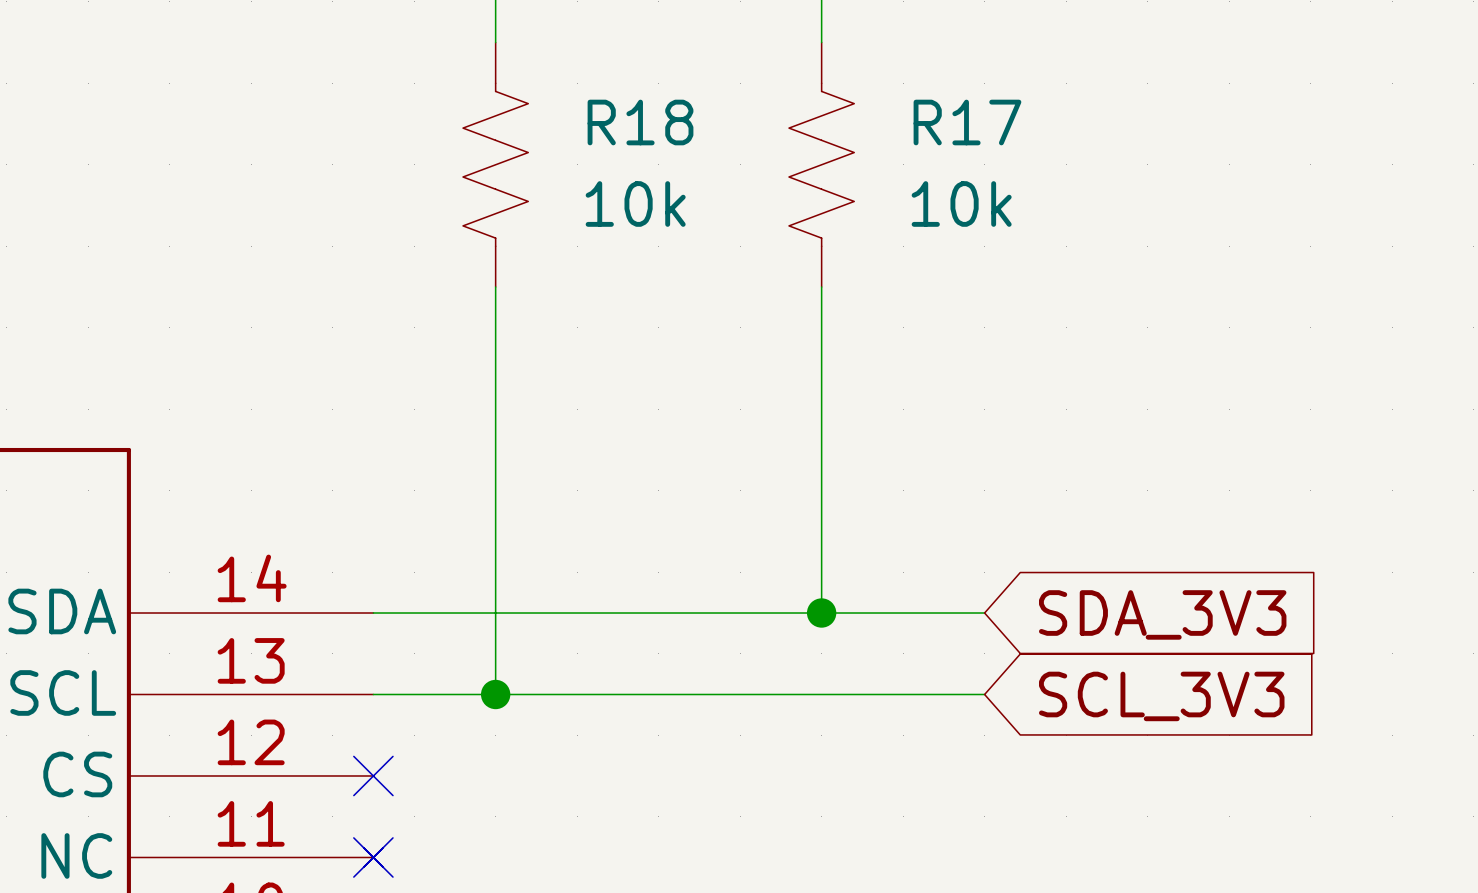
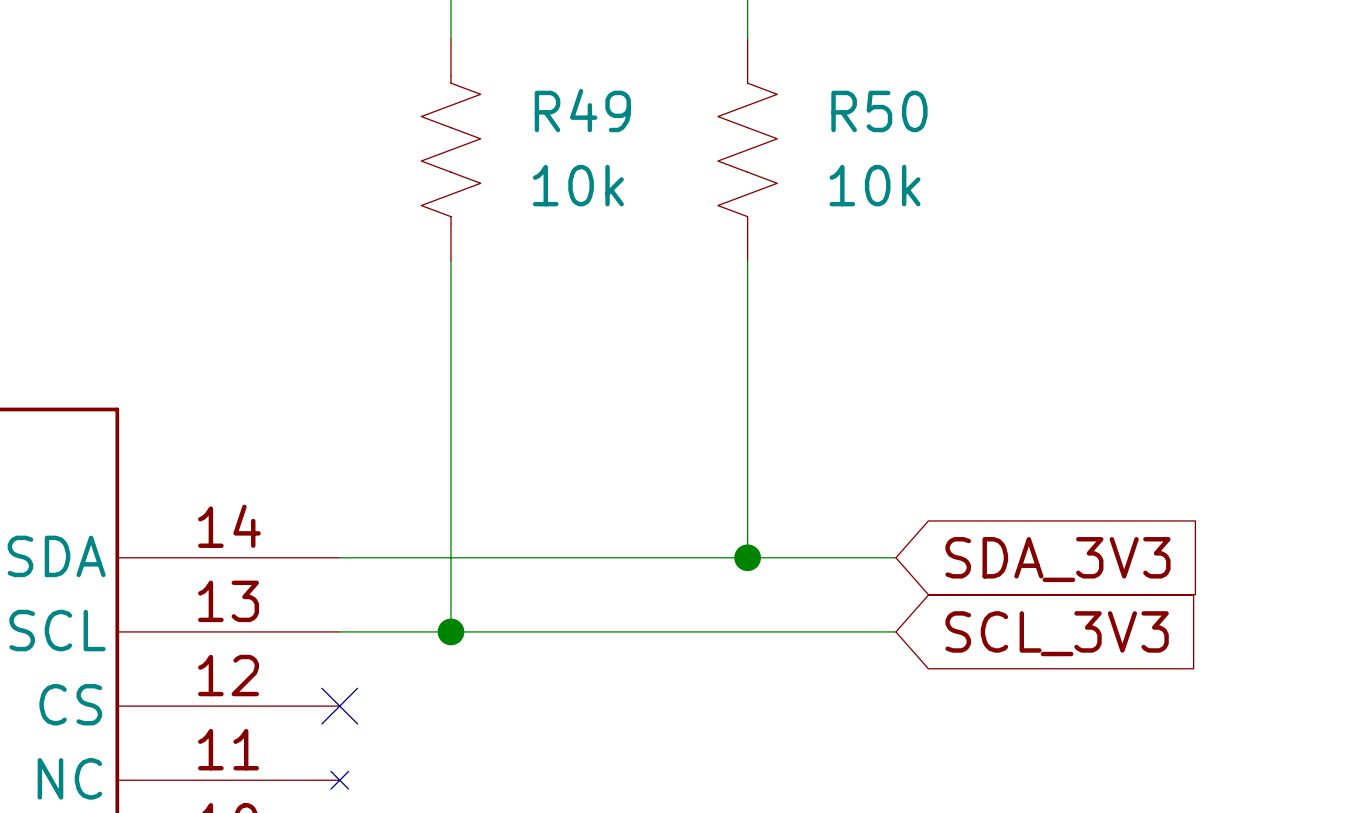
R18 name: R18 (640, 122) -> R49 (582, 110)
R17 name: R17 (967, 122) -> R50 (879, 111)
no-connect mark: (373, 857) -> none

